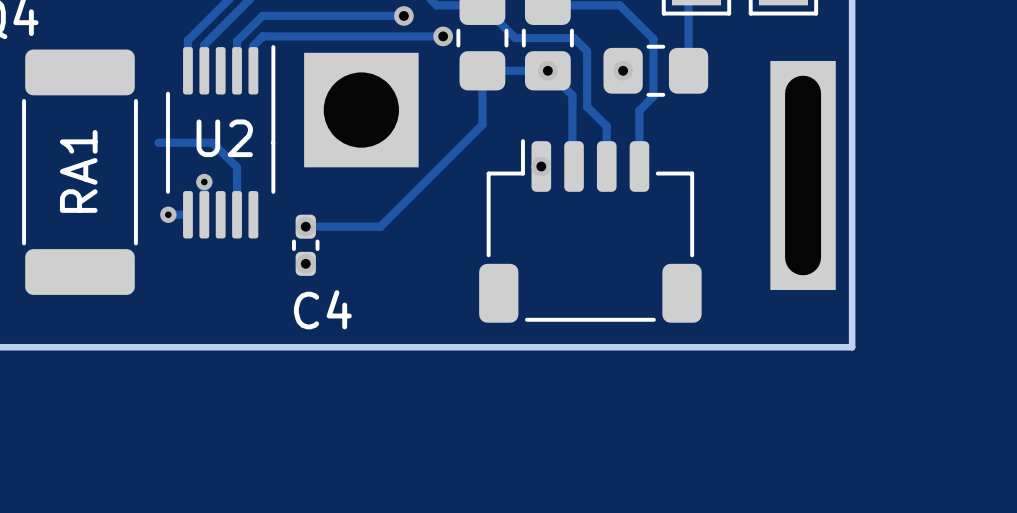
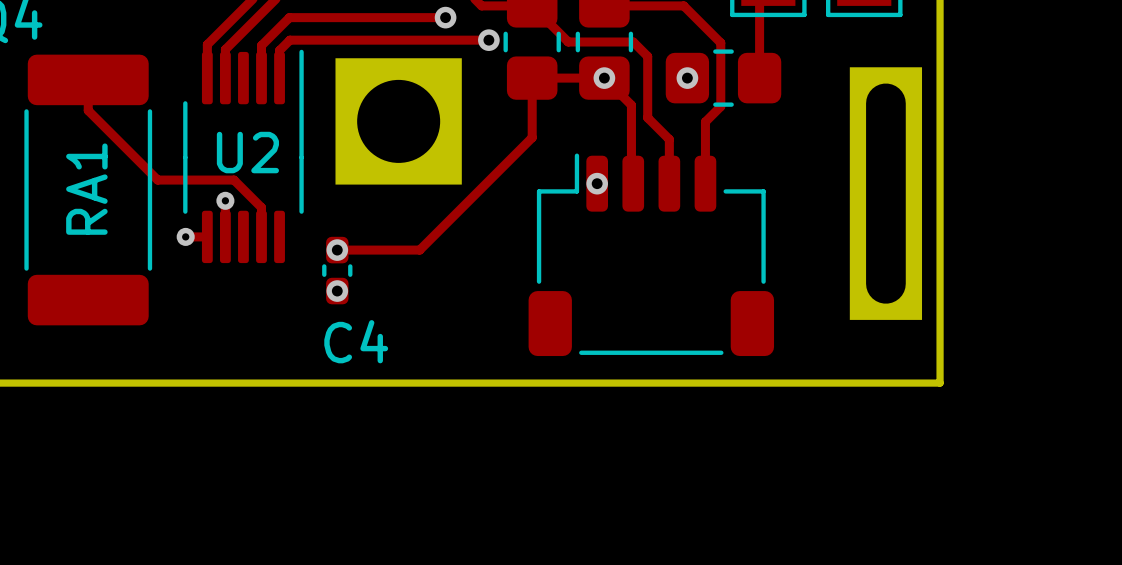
track: (158, 142) (212, 142) (237, 167) (237, 188) -> (88, 79) (88, 110) (157, 180) (234, 180) (261, 207)

